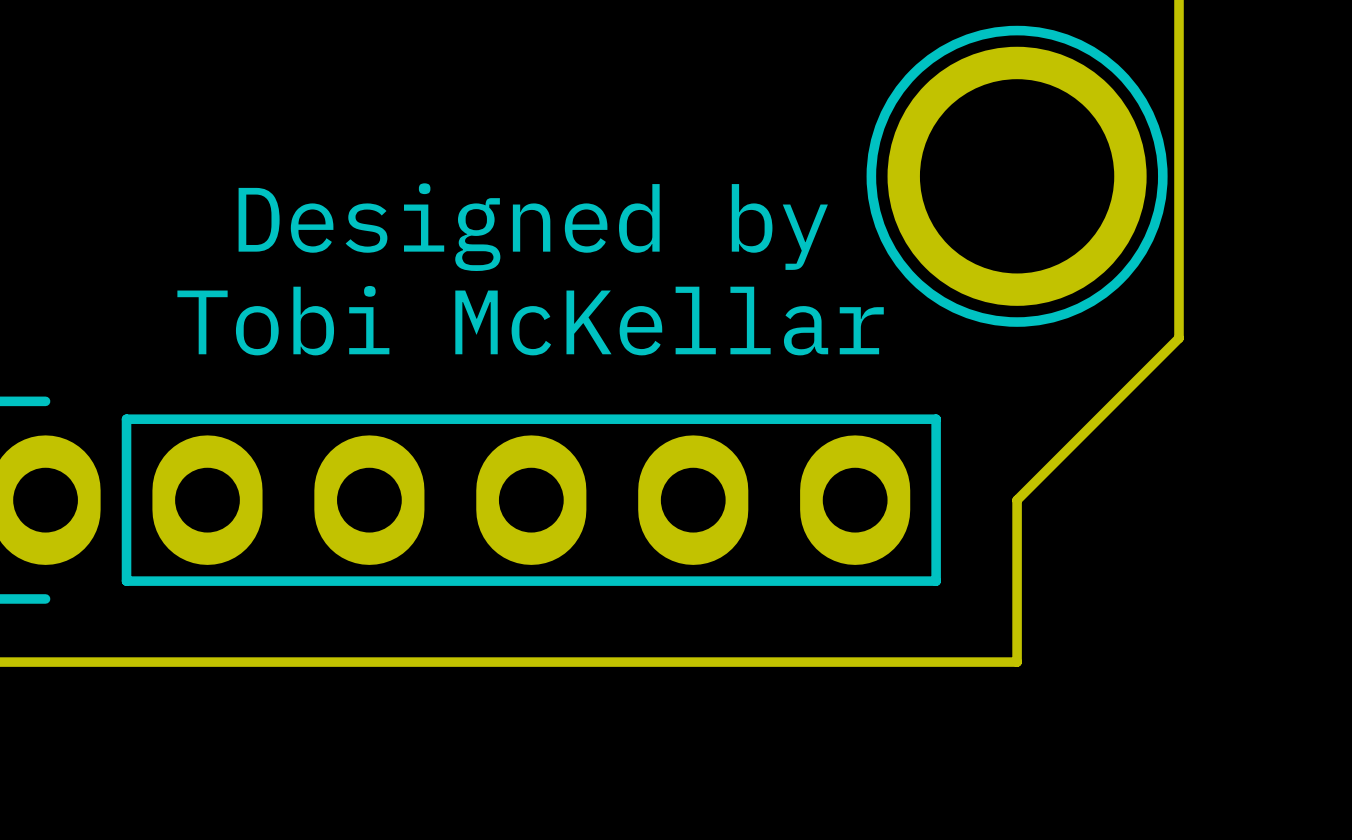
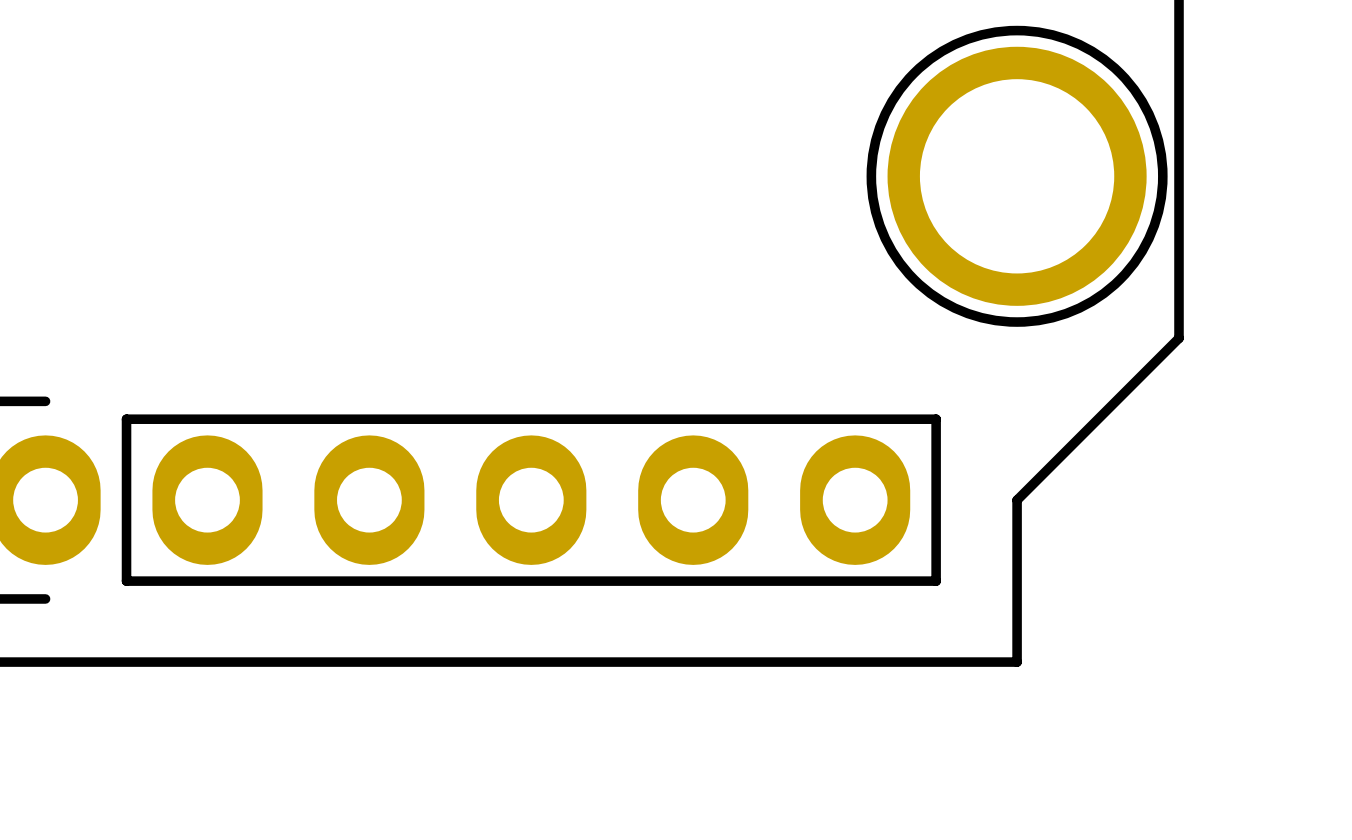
text: Designed by (533, 227) -> none
text: Tobi McKellar (530, 320) -> none

